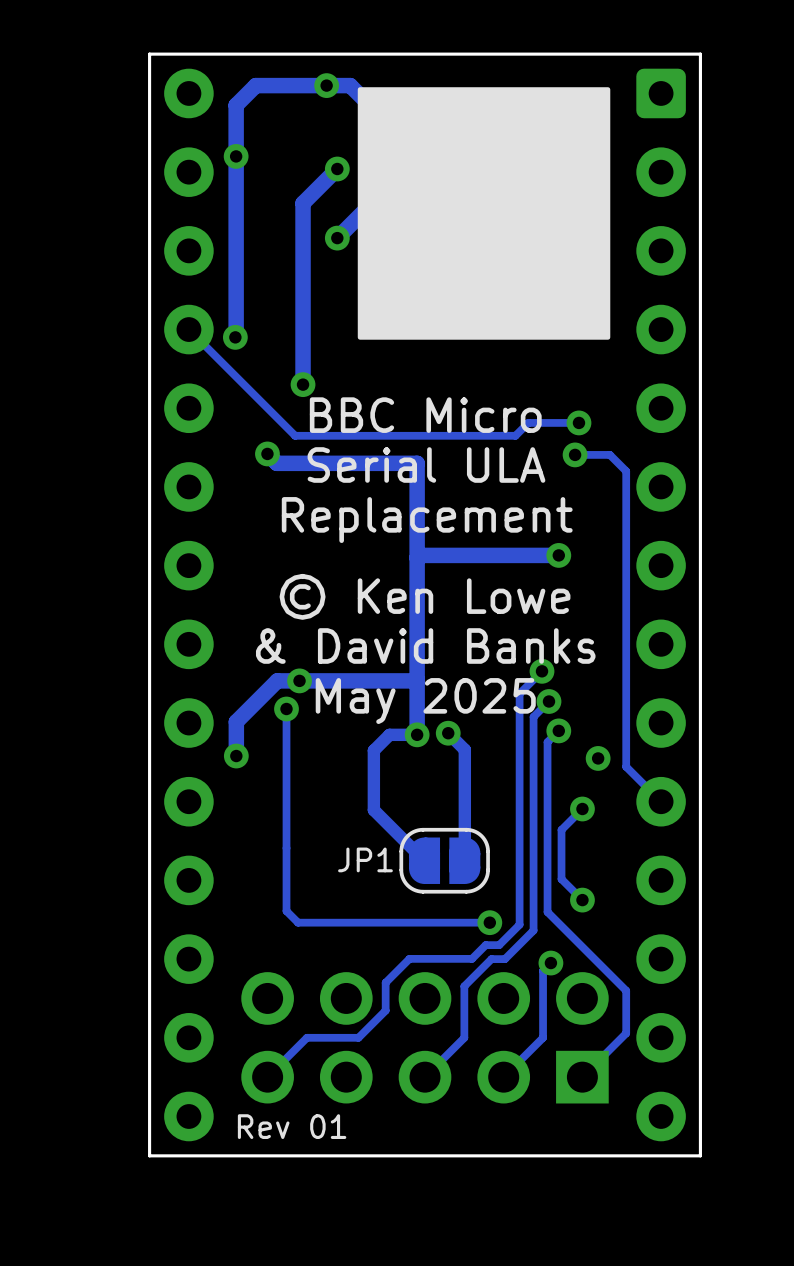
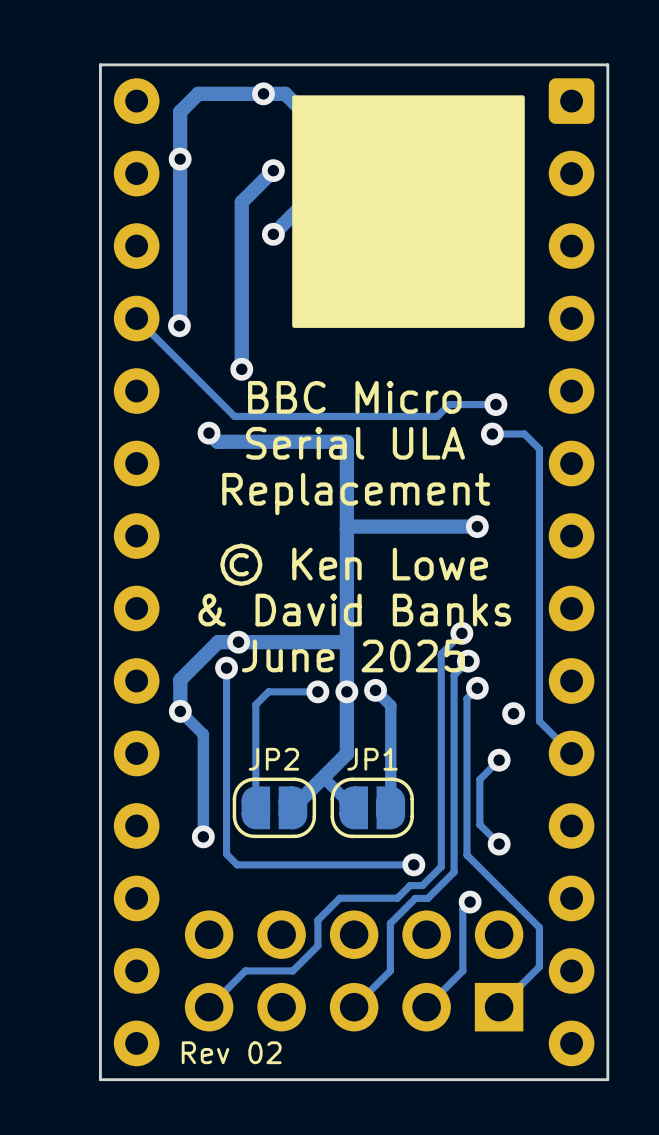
text: May 2025 (425, 701) -> June 2025 (353, 655)
track: none -> (317, 691) (268, 691) (255, 704) (255, 807)
via: none -> (317, 691)
track: (417, 734) (389, 734) (373, 750) (373, 810) (391, 827) -> (346, 691) (346, 753) (292, 807)
track: none -> (180, 711) (203, 734) (203, 836)
JP1 name position: JP1 (365, 859) -> JP1 (372, 759)
JP2: none -> (274, 807)
via: none -> (203, 836)
text: Rev 01 (292, 1126) -> Rev 02 (231, 1052)

